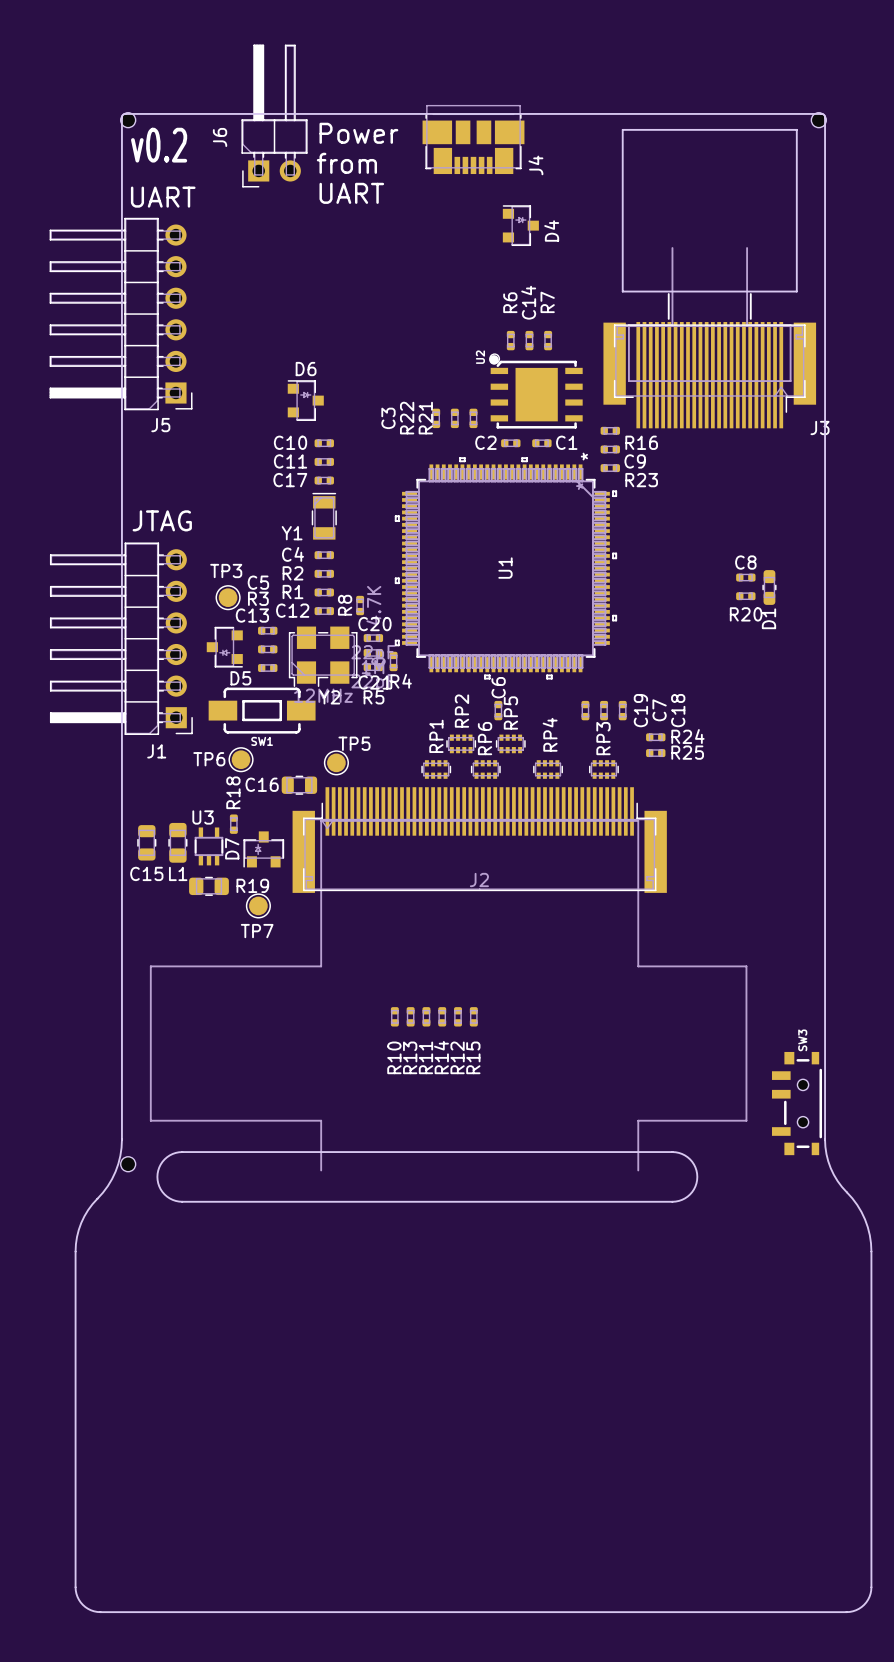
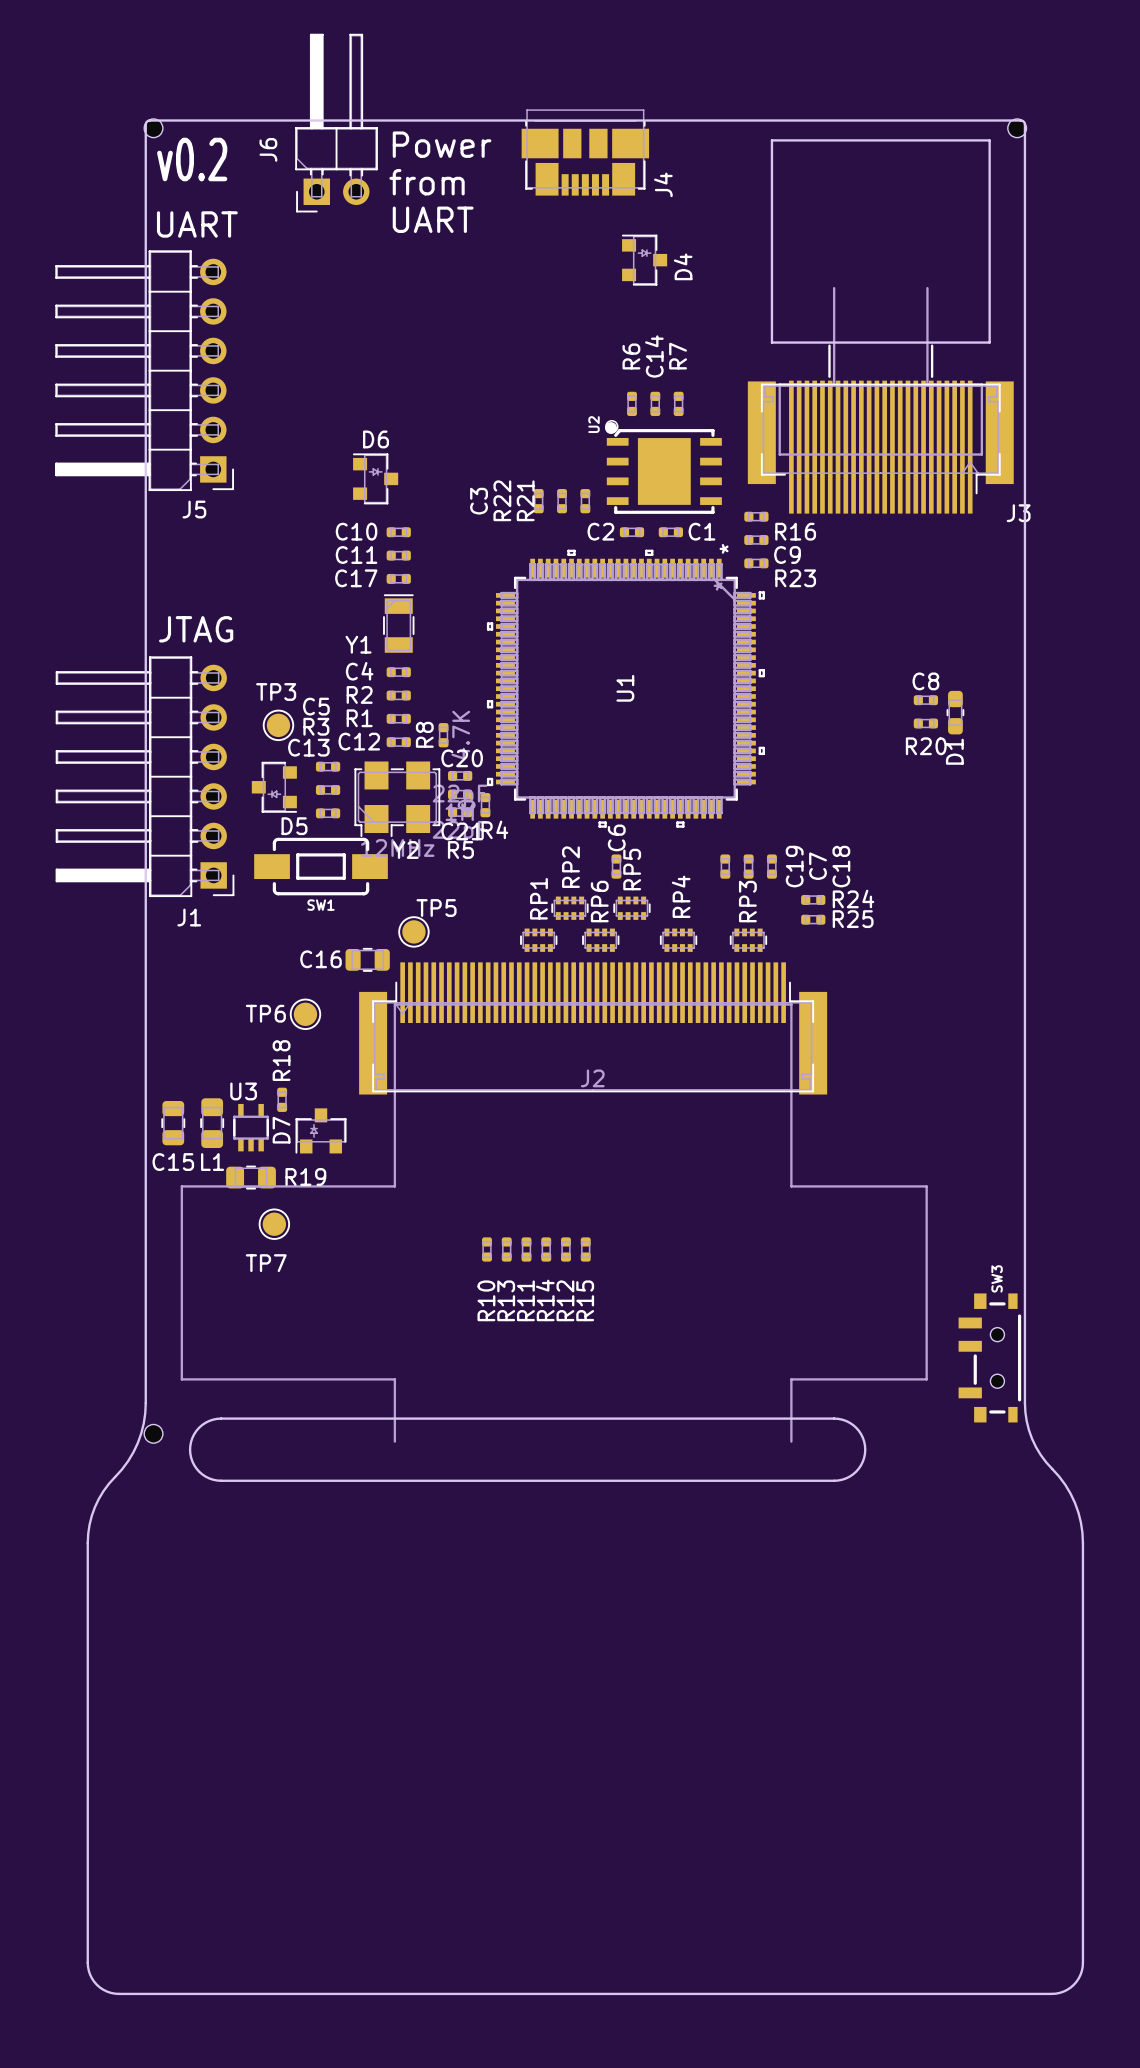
TP6 position: (241, 759) -> (305, 1014)
R18 position: (233, 824) -> (282, 1099)
C15 position: (146, 842) -> (173, 1123)
L1 position: (177, 842) -> (212, 1123)
U3 position: (208, 846) -> (251, 1127)
D7 position: (263, 849) -> (321, 1130)
R19 position: (208, 886) -> (251, 1177)
TP7 position: (258, 905) -> (274, 1224)
TP7 name position: TP7 (257, 931) -> TP7 (266, 1263)

